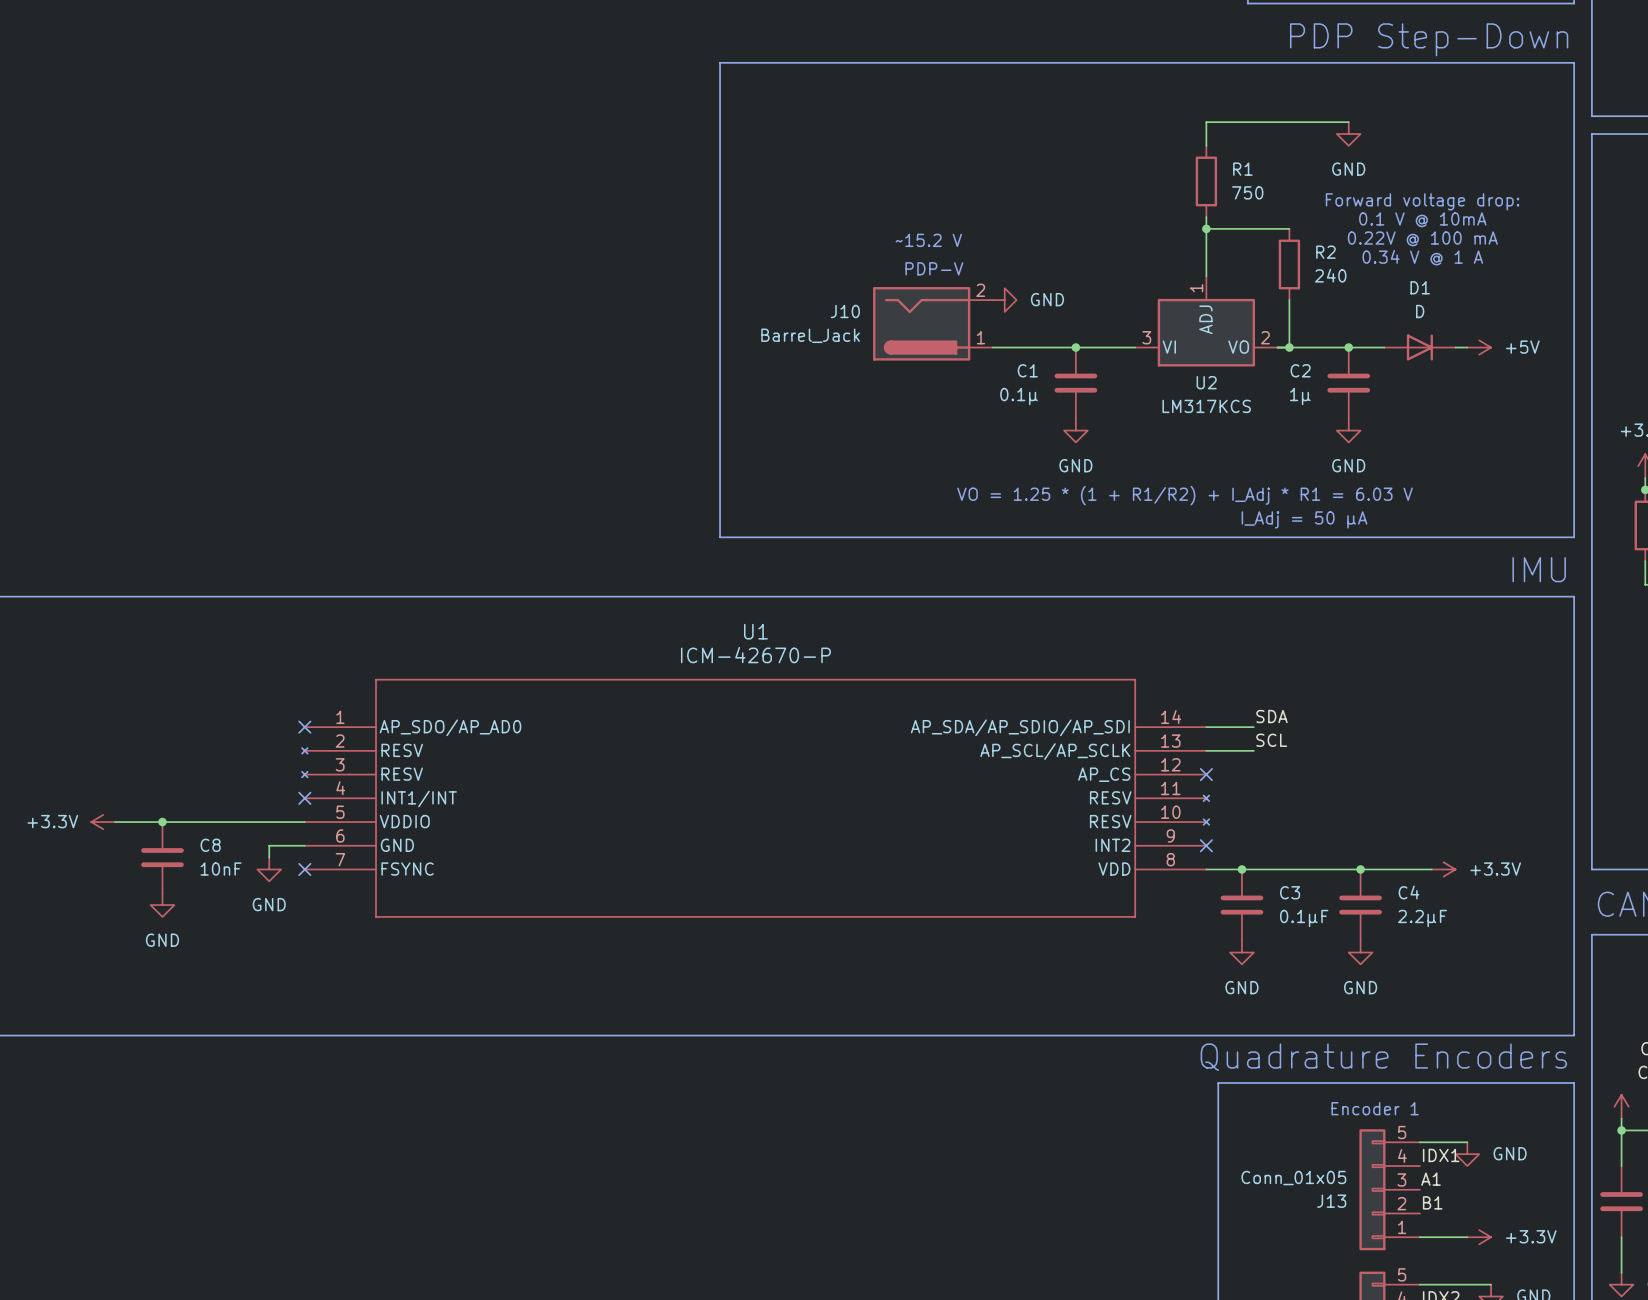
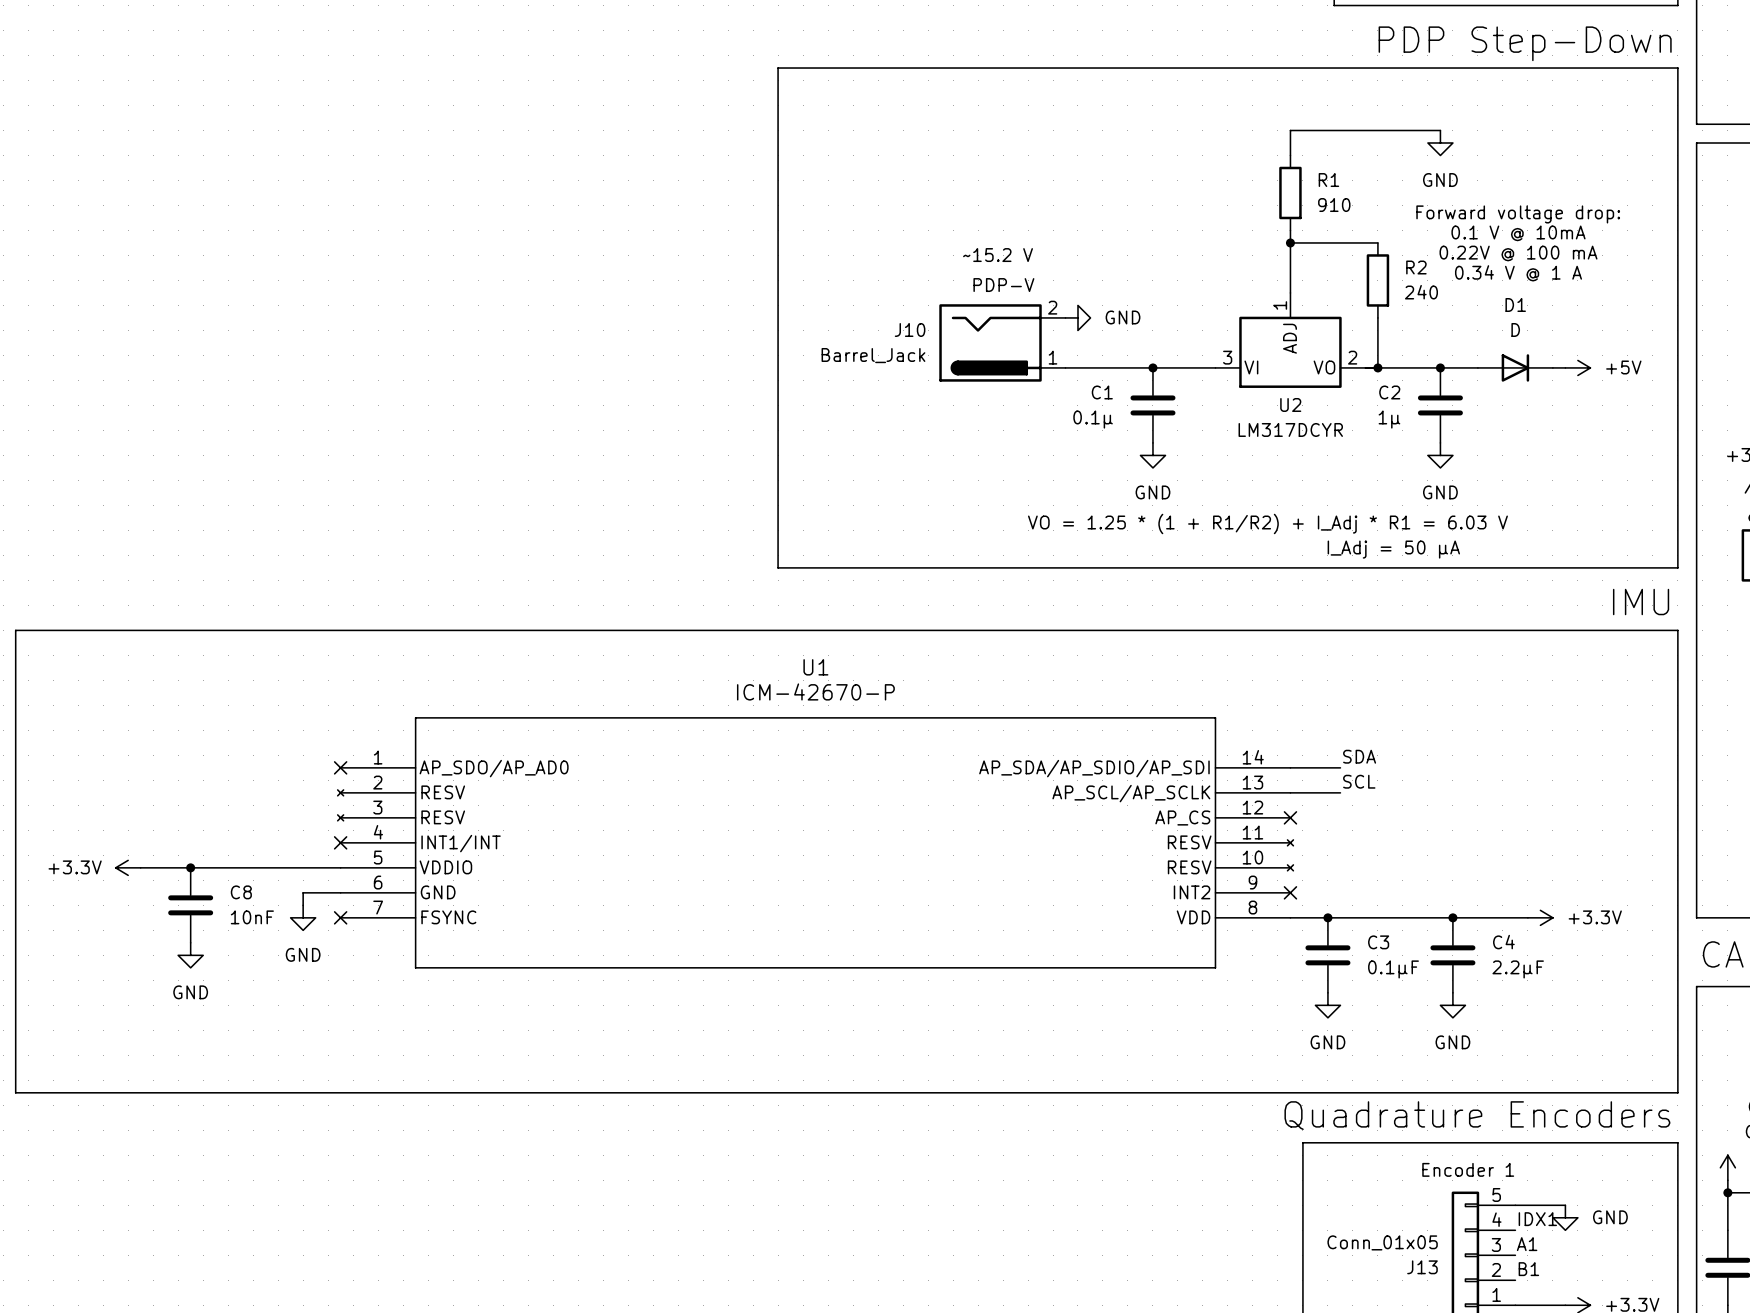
R1 value: 750 (1247, 192) -> 910 (1334, 205)
U2 value: LM317KCS (1206, 406) -> LM317DCYR (1290, 429)

